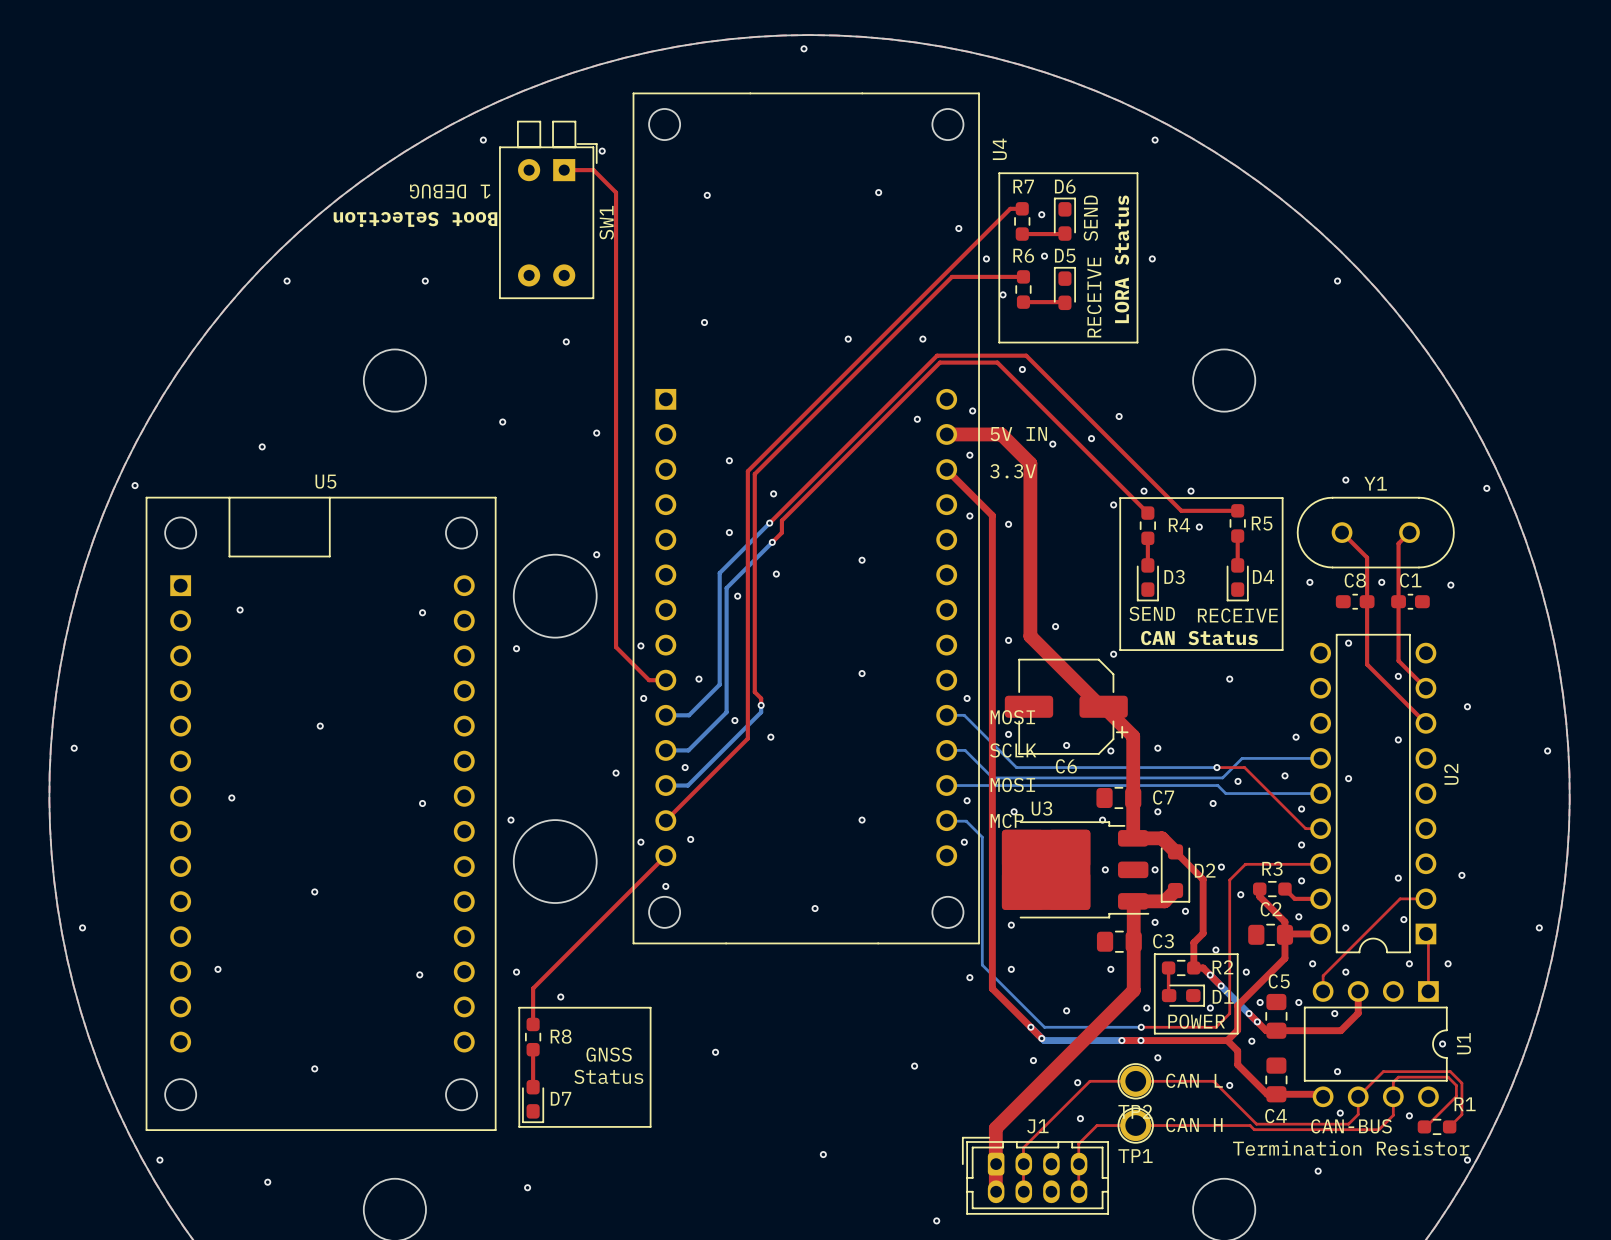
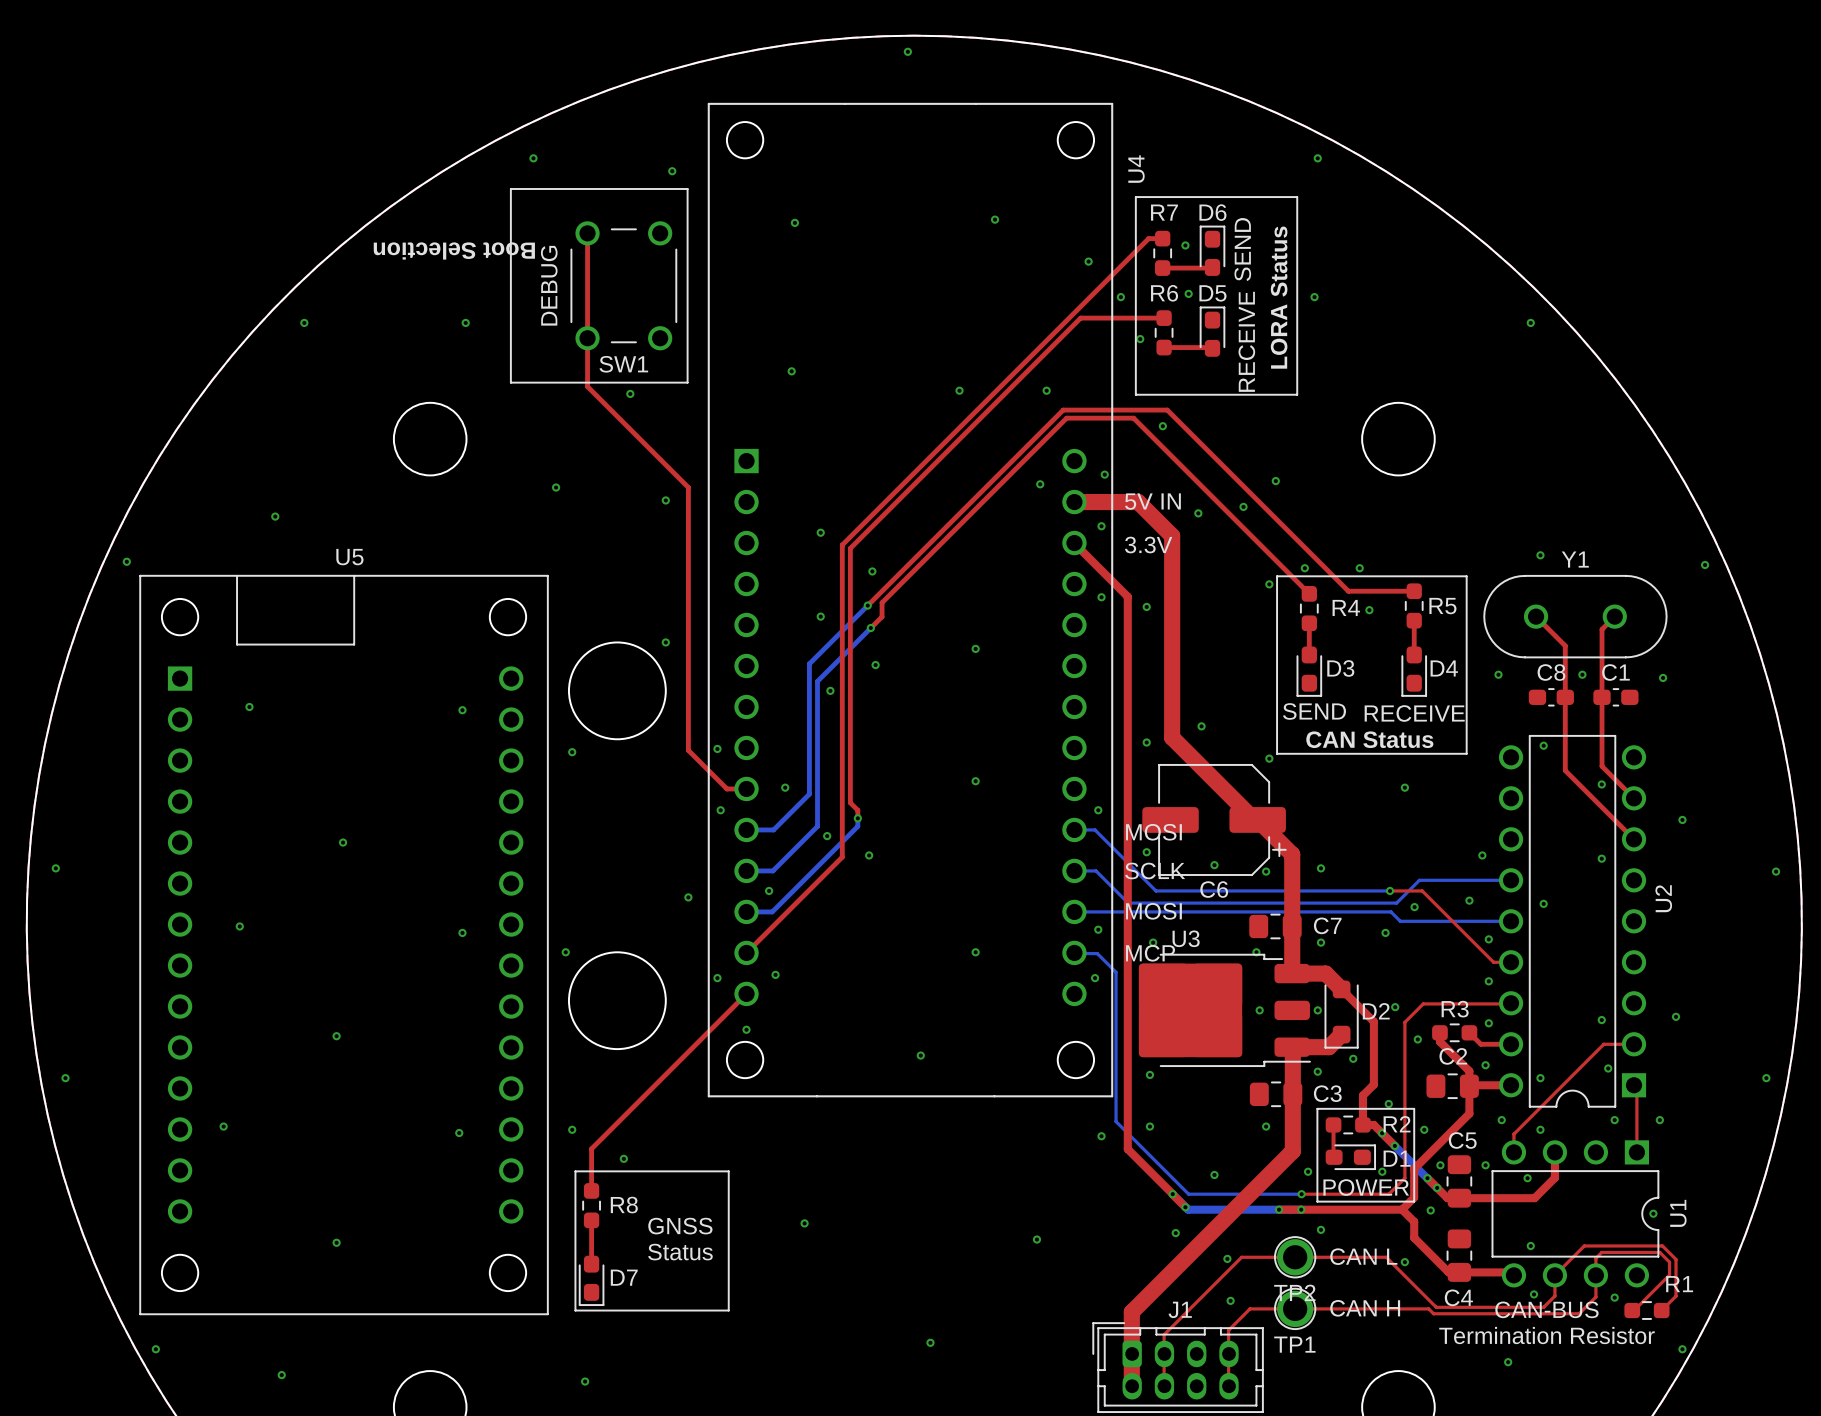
SW1 footprint: [499, 120, 598, 300] -> [570, 221, 678, 351]
line: none -> (510, 188) (687, 188) (687, 382) (510, 382) (510, 188)
top track: (564, 170) (593, 170) (616, 192) (616, 422) -> (587, 233) (587, 386) (688, 487)
text: 1 DEBUG (450, 191) -> none
SW1 name position: SW1 (606, 222) -> SW1 (623, 364)
text: none -> DEBUG (549, 285)

